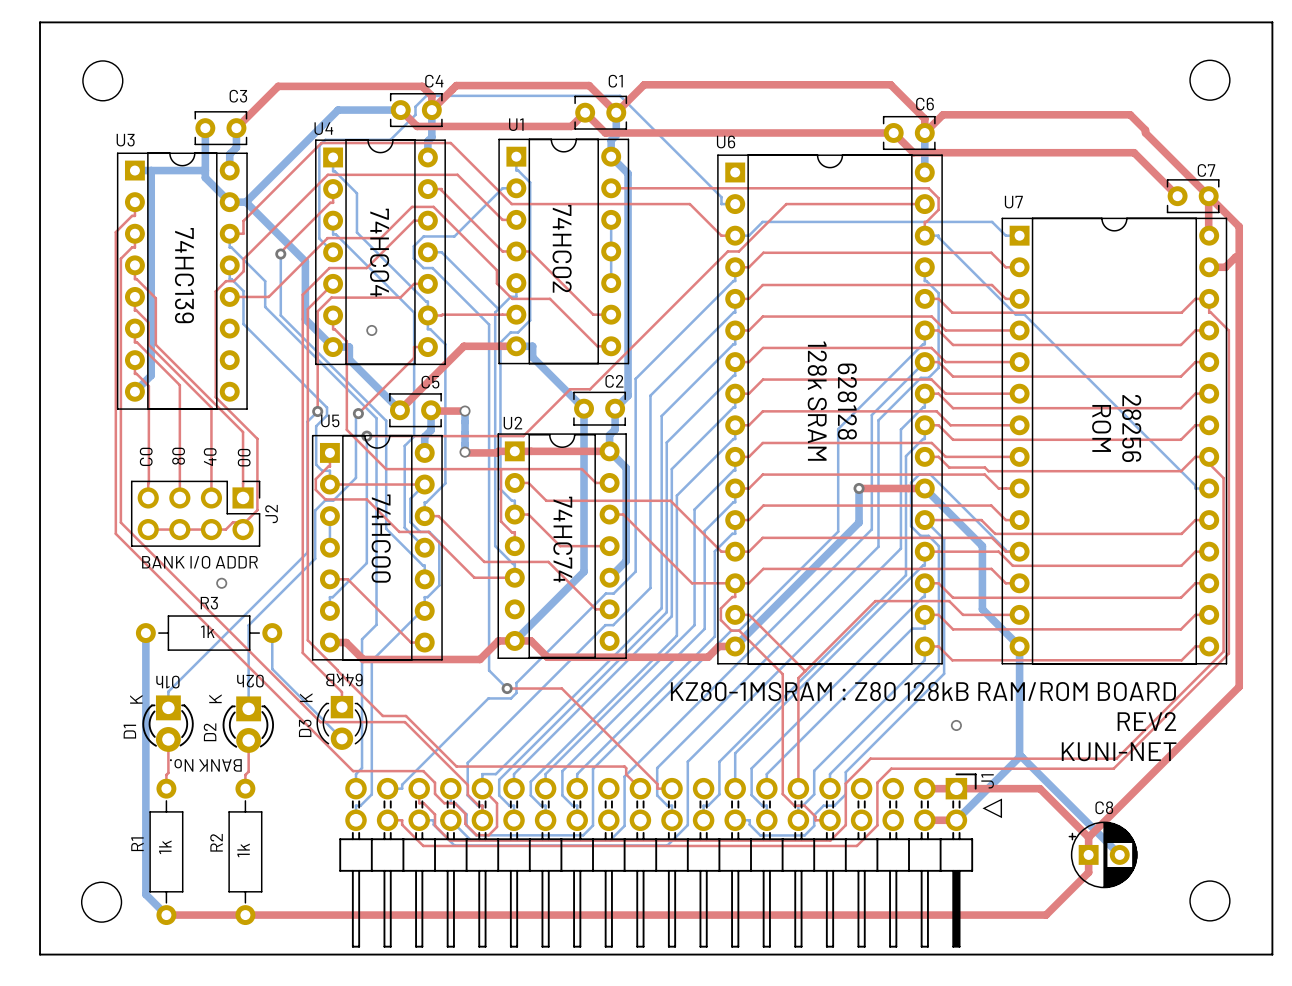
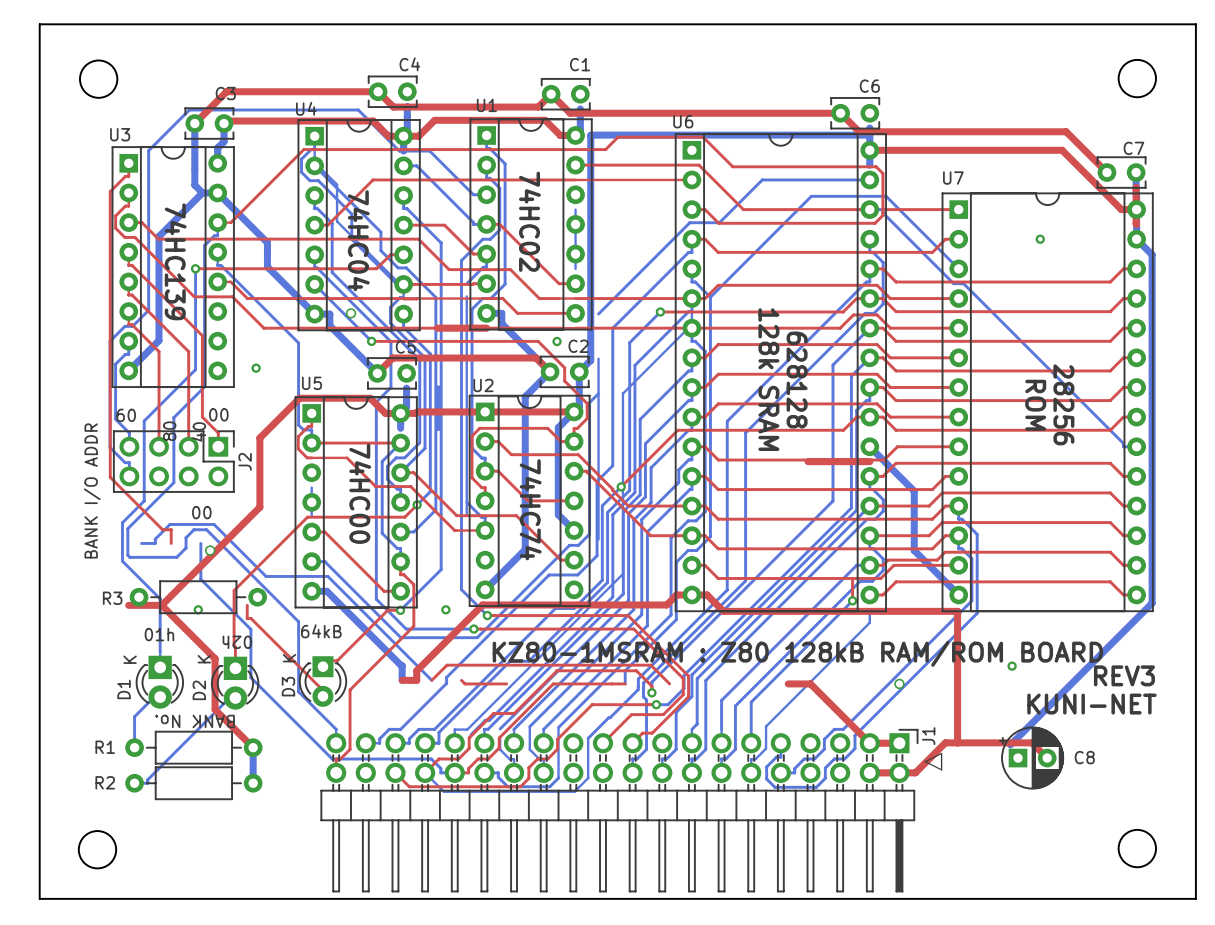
top track: (400, 110) (417, 126) (571, 126) (585, 112) (605, 132) (893, 132) (913, 152) (1134, 152) (1177, 196) -> none
bottom track: (400, 110) (338, 110) (246, 202) -> none
C4 position: (416, 110) -> (392, 91)
C1 position: (600, 112) -> (565, 94)
top track: (239, 125) (278, 86) (422, 86) (431, 95) (431, 110) (456, 85) (589, 85) (616, 112) (644, 84) (890, 84) (924, 118) (924, 132) (942, 114) (1130, 114) (1145, 130) (1145, 132) (1239, 226) (1239, 686) (1088, 837) -> (226, 121) (373, 121) (388, 136) (418, 136) (434, 120) (545, 120) (560, 135) (575, 135)
top track: none -> (194, 123) (226, 91) (378, 91) (393, 107) (538, 107) (551, 94) (570, 113) (840, 113) (859, 131) (1066, 131) (1106, 172)
C6 position: (909, 132) -> (855, 113)
bottom track: none -> (486, 135) (486, 148) (489, 148) (505, 163) (505, 284) (490, 298) (482, 298) (472, 309) (472, 448) (481, 458) (485, 458) (485, 471)
bottom track: (611, 140) (611, 156) (628, 173) (628, 395) (615, 408) -> (869, 135) (591, 135) (590, 360) (579, 371) (579, 386)
bottom track: none -> (314, 136) (314, 149) (311, 149) (301, 159) (301, 172) (309, 180) (318, 180) (351, 214) (351, 239) (403, 291)
bottom track: (516, 156) (516, 170) (530, 182) (530, 320) (518, 332) (510, 332) (500, 342) (500, 489) (511, 500) (514, 500) (514, 514) -> none
top track: none -> (869, 150) (1062, 150) (1121, 209) (1136, 209)
top track: none -> (128, 163) (128, 176) (125, 176) (110, 191) (110, 477) (162, 529) (171, 529) (171, 543)
bottom track: (134, 170) (205, 170) -> none
bottom track: (151, 170) (151, 375) -> (202, 192) (158, 236) (158, 340) (144, 355)
bottom track: none -> (486, 165) (486, 178) (489, 178) (499, 188) (499, 229) (490, 239) (482, 239) (461, 260) (461, 589) (487, 615)
top track: none -> (575, 165) (699, 165) (743, 209) (869, 209)
bottom track: none -> (314, 165) (380, 232) (380, 250) (398, 267) (406, 267) (435, 297) (435, 509) (413, 531) (400, 531)
bottom track: none -> (403, 165) (416, 165) (473, 224) (486, 224)
bottom track: (205, 177) (229, 202) (246, 202) -> (194, 170) (194, 185) (202, 192)
bottom track: none -> (1136, 172) (1136, 239) (1152, 254) (1152, 603) (1010, 744)
bottom track: (516, 188) (502, 188) (454, 236) (423, 236) (413, 246) (413, 258) (423, 268) (432, 268) (489, 324) (489, 670) (507, 688) -> none
top track: none -> (575, 179) (373, 179) (327, 225) (314, 225)
top track: (735, 188) (928, 188) (938, 198) (938, 209) (924, 221) (924, 235) -> none
bottom track: none -> (869, 179) (762, 179) (719, 222) (689, 222) (598, 314)
top track: (333, 189) (333, 202) (330, 202) (280, 254) -> none
top track: (427, 189) (441, 189) (502, 251) (530, 251) (593, 314) -> (128, 222) (141, 222) (158, 239) (418, 239) (449, 269) (510, 269) (539, 298) (558, 298)
C7 position: (1193, 196) -> (1121, 172)
bottom track: none -> (202, 192) (217, 192) (267, 242) (267, 266) (314, 314) (329, 314) (329, 325) (377, 373)
bottom track: (246, 202) (305, 261) (305, 319) (333, 347) (349, 347) (349, 359) (399, 410) -> none
bottom track: none -> (314, 195) (314, 208) (317, 208) (332, 223) (332, 272) (419, 360) (419, 442) (404, 457) (396, 457) (387, 466) (387, 479) (397, 489) (400, 489) (400, 502)
bottom track: none -> (403, 195) (403, 208) (406, 208) (441, 242) (441, 569) (400, 610)
bottom track: none -> (486, 194) (473, 194) (429, 151) (399, 151) (358, 110) (189, 110) (148, 150) (148, 310) (132, 326) (124, 326) (110, 341) (110, 447) (125, 462) (129, 462) (129, 476)
bottom track: (735, 204) (721, 204) (721, 197) (620, 95) (426, 95) (415, 106) (415, 114) (390, 139) (325, 139) (319, 145) (319, 238) (333, 252) -> none
top track: (924, 204) (786, 204) (738, 251) -> (958, 239) (945, 239) (932, 252) (718, 252) (705, 239) (695, 239)
top track: (134, 215) (132, 215) (115, 232) (115, 533) (353, 771) (423, 771) (435, 782) (435, 793) (444, 803) (454, 803) (465, 813) (465, 823) (476, 835) (488, 835) (497, 826) (497, 803) (482, 788) -> none
top track: (516, 219) (502, 219) (457, 174) (327, 174) (243, 259) (243, 271) (233, 281) (226, 281) (215, 291) (215, 397) (257, 438) (257, 510) (245, 522) (233, 522) (225, 529) (148, 529) -> none
bottom track: none -> (869, 209) (882, 209) (882, 212) (953, 283) (963, 283) (1123, 443) (1123, 446) (1136, 446)
top track: none -> (882, 209) (958, 209)
bottom track: (333, 220) (333, 234) (335, 234) (414, 312) (414, 436) (404, 445) (404, 527) (424, 547) -> none
top track: (427, 220) (414, 220) (366, 268) (329, 268) (302, 294) (302, 652) (341, 692) (341, 707) -> none
top track: (134, 233) (134, 247) (132, 247) (120, 258) (120, 522) (320, 722) (404, 722) (467, 785) (467, 794) (478, 805) (482, 805) (482, 820) -> (625, 683) (553, 683) (499, 738) (499, 748) (488, 758) (478, 758) (468, 768) (468, 772) (454, 772)
top track: (243, 233) (243, 221) (321, 143) (450, 143) (511, 204) (689, 204) (721, 235) (735, 235) -> (230, 222) (303, 149) (605, 149) (618, 137) (703, 137) (732, 166) (876, 166) (882, 173) (882, 215) (875, 223) (718, 223) (705, 209) (691, 209)
top track: none -> (486, 224) (499, 224) (559, 283) (575, 283)
bottom track: (735, 235) (748, 235) (762, 221) (992, 221) (1005, 235) (1019, 235) -> none
bottom track: (924, 235) (938, 235) (1015, 314) (1024, 314) (1195, 485) (1195, 488) (1209, 488) -> none
top track: none -> (403, 225) (444, 225) (473, 254) (486, 254)
bottom track: (229, 247) (265, 281) (265, 306) (376, 418) (376, 624) (362, 639) (362, 768) (356, 774) -> (217, 235) (214, 235) (204, 245) (204, 386) (173, 417) (173, 482) (127, 528) (127, 555) (130, 557) (176, 557) (186, 548) (186, 537) (194, 529) (206, 529) (298, 621) (298, 691) (336, 729)
text position: 74HC02 (562, 248) -> 74HC02 (529, 221)
U1 position: (563, 251) -> (531, 224)
top track: (735, 251) (727, 251) (590, 389) (570, 389) (523, 436) (366, 436) -> none
bottom track: none -> (869, 239) (869, 252) (873, 252) (883, 262) (883, 304) (873, 313) (865, 313) (745, 432) (745, 580) (643, 682) (643, 688)
via: none -> (1040, 239)
U4 position: (380, 252) -> (359, 225)
bottom track: (427, 252) (441, 252) (498, 309) -> none
bottom track: (280, 254) (280, 315) (386, 420) (386, 528) (424, 565) (424, 579) -> none
via: (280, 254) -> none
top track: (1239, 257) (1235, 257) (1225, 267) (1209, 267) -> none
bottom track: none -> (486, 254) (486, 267) (483, 267) (466, 283)
top track: (735, 267) (748, 267) (763, 252) (991, 252) (1005, 267) (1019, 267) -> none
bottom track: (735, 267) (735, 281) (635, 378) -> none
bottom track: (924, 267) (924, 281) (938, 293) (938, 367) (928, 377) (920, 377) (878, 420) (878, 546) (657, 768) (657, 795) (667, 805) (672, 805) -> (643, 688) (643, 696) (646, 699) (646, 749) (636, 758) (632, 759)
bottom track: none -> (314, 254) (314, 267) (317, 267) (390, 341) (390, 387) (376, 402) (376, 599) (406, 629) (473, 629)
top track: none -> (403, 254) (390, 254) (376, 268) (195, 268)
top track: (134, 279) (155, 298) (155, 344) (243, 432) (243, 497) -> (128, 265) (132, 265) (202, 335) (202, 417) (218, 433) (218, 446)
bottom track: (229, 279) (243, 291) (243, 324) (327, 407) (327, 415) (316, 426) (316, 464) (322, 470) (329, 470) (329, 484) -> (217, 265) (220, 265) (298, 342) (298, 425) (303, 429) (311, 429) (311, 443)
via: none -> (195, 268)
top track: (333, 283) (307, 309) (307, 640) (382, 715) (406, 715) (456, 766) (624, 766) (626, 774) (640, 788) -> (473, 629) (633, 629) (683, 678) (683, 694) (663, 714) (631, 714) (602, 743)
top track: (427, 283) (414, 283) (400, 297) (331, 297) (317, 311) (317, 411) -> none
bottom track: (516, 283) (516, 296) (510, 296) (495, 312) -> none
bottom track: none -> (691, 268) (691, 282) (695, 282) (710, 297)
top track: none -> (869, 268) (882, 268) (896, 282) (1110, 282) (1123, 268) (1136, 268)
bottom track: none -> (869, 268) (869, 282) (866, 282) (727, 421) (727, 590) (638, 678) (638, 686)
bottom track: none -> (958, 268) (886, 196) (811, 196) (710, 297)
top track: (243, 296) (268, 296) (327, 238) (380, 238) (412, 206) (433, 206) (496, 270) (496, 283) (512, 298) -> (230, 281) (247, 298) (417, 298)
top track: none -> (482, 283) (403, 284)
top track: (516, 298) (550, 298) (597, 346) -> (486, 328) (562, 328)
top track: (735, 298) (748, 298) (762, 285) (991, 285) (1005, 298) (1019, 298) -> none
bottom track: (735, 298) (735, 312) (650, 395) (650, 587) (613, 625) (605, 625) (467, 762) (467, 795) (477, 805) (482, 805) (482, 820) -> (200, 543) (200, 579) (250, 629) (250, 677) (332, 758) (431, 758) (440, 768) (440, 772) (454, 772)
top track: (924, 298) (938, 298) (952, 312) (1181, 312) (1195, 298) (1209, 298) (1209, 312) (1228, 330) (1228, 653) (1113, 768) (891, 768) (877, 782) (877, 825) (856, 845) (423, 845) (402, 824) (402, 820) (387, 820) -> none
bottom track: none -> (314, 284) (371, 341)
top track: (134, 310) (148, 322) (148, 344) (211, 407) (211, 497) -> (128, 294) (132, 295) (188, 351) (188, 446)
bottom track: (427, 313) (427, 329) (430, 329) (445, 344) (445, 483) (424, 502) (424, 516) -> (403, 297) (400, 297) (390, 307) (390, 323) (425, 357) (425, 448) (400, 472)
bottom track: none -> (710, 297) (710, 536) (696, 550) (688, 550) (676, 562) (676, 619) (625, 670) (625, 683)
top track: none -> (486, 298) (502, 298) (517, 313) (575, 313)
top track: none -> (575, 298) (705, 298) (718, 285) (877, 285) (890, 298) (958, 298)
bottom track: none -> (691, 298) (691, 311) (688, 311) (634, 365) (634, 492) (612, 514) (612, 596) (489, 720) (485, 720) (470, 734)
top track: none -> (1136, 298) (1123, 298) (1110, 311) (896, 311) (882, 298) (856, 298) (843, 312) (660, 312)
top track: (333, 315) (333, 329) (346, 341) (346, 429) (386, 469) (582, 469) (595, 482) (609, 482) -> none
bottom track: none -> (660, 312) (629, 342) (629, 490) (607, 512) (607, 582) (528, 661) (510, 661) (438, 732) (438, 743) (425, 743)
via: none -> (660, 312)
bottom track: none -> (486, 313) (501, 313) (501, 323) (550, 371) (525, 396) (525, 549) (485, 589)
top track: (735, 330) (748, 330) (762, 316) (931, 316) (945, 330) (1019, 330) -> none
top track: (924, 330) (938, 330) (953, 344) (1180, 344) (1195, 330) (1209, 330) -> none
bottom track: (924, 330) (924, 344) (838, 429) (838, 531) (739, 630) (731, 630) (593, 768) (593, 771) -> (691, 328) (691, 341) (695, 341) (705, 351) (705, 511) (696, 520) (688, 520) (671, 537) (671, 615) (558, 727)
bottom track: none -> (403, 314) (403, 327) (430, 353) (430, 491) (417, 504)
top track: (134, 342) (179, 385) (179, 497) -> (128, 324) (132, 324) (159, 351) (159, 446)
top track: (463, 346) (399, 410) -> (437, 328) (263, 328) (232, 296) (194, 296) (134, 237) (124, 237) (115, 228) (115, 215) (125, 206) (128, 205)
bottom track: (516, 346) (532, 346) (532, 357) (584, 408) (584, 571) (514, 640) -> none
top track: none -> (575, 328) (840, 328) (853, 314) (877, 314) (890, 328) (958, 328)
top track: none -> (869, 328) (882, 328) (896, 341) (1110, 341) (1123, 328) (1136, 328)
bottom track: none -> (869, 328) (832, 364) (832, 501) (651, 682) (651, 692)
top track: (427, 347) (414, 347) (414, 357) (358, 413) -> none
top track: (134, 360) (134, 373) (148, 386) (148, 497) -> none
bottom track: none -> (128, 341) (128, 354) (125, 354) (115, 364) (115, 419) (129, 433) (129, 446)
top track: none -> (371, 341) (538, 341) (564, 367) (564, 381) (587, 403) (587, 418) (577, 428) (574, 428) (574, 441) (560, 441) (547, 428) (479, 428) (472, 436) (472, 477) (481, 487) (485, 487) (485, 500)
via: none -> (371, 341)
via: none -> (557, 341)
top track: (735, 362) (748, 362) (763, 347) (931, 347) (945, 362) (1019, 362) -> none
bottom track: (735, 362) (735, 375) (666, 442) (666, 612) (499, 779) (499, 795) (509, 805) (514, 805) (514, 820) -> none
top track: (924, 362) (938, 362) (953, 376) (1180, 376) (1195, 362) (1209, 362) -> none
bottom track: (924, 362) (871, 415) (871, 529) (624, 776) (624, 783) -> (638, 686) (638, 689) (588, 738)
top track: none -> (691, 357) (705, 357) (718, 344) (877, 344) (890, 357) (958, 357)
top track: none -> (869, 357) (882, 357) (896, 370) (1110, 370) (1123, 357) (1136, 357)
bottom track: none -> (869, 357) (851, 376) (851, 508) (684, 675) (684, 688) (667, 704) (656, 704)
via: none -> (256, 368)
top track: none -> (550, 371) (536, 358) (392, 358) (377, 373)
top track: (735, 393) (748, 393) (763, 379) (931, 379) (945, 393) (1019, 393) -> none
bottom track: (735, 393) (735, 407) (671, 469) (671, 616) (514, 774) -> (691, 357) (691, 370) (688, 370) (640, 419) (640, 494) (623, 511) (623, 593) (487, 729) (484, 729)
top track: (924, 393) (938, 393) (953, 408) (1180, 408) (1195, 393) (1209, 393) -> none
bottom track: (924, 393) (924, 407) (900, 429) (900, 548) (687, 761) (687, 825) (667, 845) (454, 845) (433, 824) (433, 820) (419, 820) -> none
C2 position: (599, 408) -> (564, 371)
top track: none -> (691, 387) (705, 387) (718, 374) (877, 374) (890, 387) (958, 387)
bottom track: none -> (691, 387) (691, 400) (688, 400) (645, 443) (645, 496) (628, 513) (628, 600) (500, 728)
U6 position: (830, 409) -> (780, 372)
top track: none -> (869, 387) (882, 387) (896, 400) (1110, 400) (1123, 387) (1136, 387)
C5 position: (415, 410) -> (391, 373)
top track: (431, 410) (465, 411) -> none
bottom track: (317, 411) (307, 421) (307, 552) (168, 691) -> (195, 268) (195, 369) (144, 420) (144, 501) (122, 522) (122, 561) (160, 598) (160, 652)
via: (317, 411) -> none
via: (465, 411) -> none
bottom track: (358, 413) (355, 416) (355, 477) (333, 500) (325, 500) (315, 510) (315, 558) (248, 625) (248, 708) -> none
via: (358, 413) -> none
bottom track: none -> (598, 393) (589, 402) (589, 534) (578, 545) (569, 545) (477, 637) (400, 637) (324, 561) (311, 561)
top track: (735, 425) (748, 425) (762, 411) (936, 411) (950, 425) (1019, 425) -> none
bottom track: (735, 425) (735, 439) (676, 495) (676, 635) (530, 781) -> none
top track: (924, 425) (938, 425) (953, 439) (1180, 439) (1195, 425) (1209, 425) -> none
bottom track: (924, 425) (924, 439) (905, 456) (905, 575) (719, 761) (719, 794) (708, 805) (703, 805) -> (869, 387) (869, 400) (866, 400) (856, 410) (856, 510) (691, 674) (691, 696) (676, 712) (676, 749) (666, 758) (662, 759)
top track: none -> (574, 411) (385, 413) (370, 398) (299, 398) (259, 438) (259, 507) (161, 605)
bottom track: (609, 435) (609, 451) (626, 467) (626, 561) (609, 577) -> (574, 411) (558, 427) (558, 514) (574, 530)
bottom track: (366, 436) (366, 563) (332, 597) (329, 597) (329, 610) -> none
via: (366, 436) -> none
top track: none -> (311, 413) (311, 426) (308, 426) (298, 436) (298, 448) (307, 457) (311, 457)
text: none -> 60 (126, 415)
top track: none -> (691, 417) (705, 417) (718, 403) (877, 403) (890, 417) (958, 417)
U7 position: (1114, 441) -> (1047, 402)
top track: none -> (1136, 417) (1123, 417) (1110, 430) (896, 430) (882, 417) (856, 417) (843, 430) (677, 430) (621, 486)
top track: (609, 451) (465, 452) -> none
top track: (329, 452) (329, 466) (315, 479) (315, 489) (325, 499) (366, 499) (399, 531) (428, 531) (474, 577) (514, 577) -> none
via: (465, 452) -> none
text: C0 (146, 456) -> none
top track: (735, 456) (748, 456) (762, 442) (931, 442) (945, 456) (1019, 456) -> none
bottom track: (735, 456) (735, 470) (694, 509) (694, 625) (545, 774) -> (691, 417) (691, 430) (688, 430) (651, 467) (651, 502) (633, 520) (633, 609) (514, 729)
top track: (924, 456) (938, 456) (949, 467) (984, 467) (988, 471) (1181, 471) (1195, 456) (1209, 456) -> none
top track: (1202, 456) (1223, 478) (1223, 651) (1116, 758) (870, 758) (845, 783) (845, 825) (830, 840) (449, 840) (435, 825) (435, 814) (423, 803) (419, 803) (419, 788) -> none
text rotation: 0° (244, 457) -> 90° clockwise (218, 414)
top track: none -> (485, 441) (498, 441) (511, 454) (578, 454) (628, 506) (705, 506) (718, 519) (932, 519) (945, 506) (958, 506)
top track: none -> (311, 443) (400, 443)
bottom track: none -> (400, 443) (382, 461) (382, 533) (397, 548) (400, 548) (400, 561)
top track: (500, 469) (500, 521) (511, 532) (514, 532) (514, 546) -> none
top track: none -> (691, 446) (705, 446) (718, 460) (884, 460) (897, 446) (958, 446)
bottom track: none -> (869, 446) (914, 491) (914, 550) (958, 594)
top track: (514, 482) (528, 482) (546, 500) (670, 500) (721, 551) (748, 551) (762, 537) (992, 537) (1005, 551) (1019, 551) -> none
top track: (367, 484) (424, 484) -> none
bottom track: (424, 484) (410, 498) (410, 522) (420, 531) (429, 531) (439, 541) (439, 585) (427, 597) (424, 597) (424, 610) -> none
top track: (735, 488) (748, 488) (762, 474) (984, 474) (998, 488) (1019, 488) -> none
bottom track: (735, 488) (735, 502) (704, 531) (704, 628) (562, 771) -> (691, 446) (691, 459) (688, 459) (678, 469) (678, 482) (641, 519) (641, 614) (529, 726)
bottom track: (859, 488) (859, 522) (735, 646) -> none
via: (859, 488) -> none
bottom track: (924, 488) (982, 546) (982, 609) (1019, 646) (1019, 757) -> none
top track: none -> (485, 471) (498, 471) (527, 500) (574, 500)
top track: none -> (574, 471) (587, 471) (650, 535) (705, 535) (718, 548) (932, 548) (945, 535) (958, 535)
top track: none -> (400, 472) (413, 472) (456, 515) (516, 515) (560, 560) (574, 560)
top track: none -> (691, 476) (705, 476) (718, 489) (932, 489) (945, 476) (958, 476)
top track: none -> (869, 476) (882, 476) (896, 463) (1110, 463) (1123, 476) (1136, 476)
J2 position: (195, 513) -> (173, 461)
top track: (514, 514) (528, 514) (560, 546) (609, 546) -> none
top track: (609, 514) (623, 514) (692, 583) (748, 583) (763, 568) (991, 568) (1005, 583) (1019, 583) -> none
bottom track: none -> (621, 486) (602, 505) (602, 580) (574, 608) (555, 608) (434, 729) (418, 729) (409, 738) (409, 743) (395, 743)
via: none -> (621, 486)
top track: (424, 516) (438, 516) (484, 561) -> (346, 457) (375, 486) (410, 486) (456, 530)
top track: (735, 520) (748, 520) (763, 505) (991, 505) (1005, 520) (1019, 520) -> none
bottom track: (735, 520) (735, 533) (732, 533) (714, 551) (714, 636) (577, 774) -> (691, 476) (691, 489) (647, 531) (647, 625) (543, 729)
top track: (924, 520) (981, 520) (995, 533) (1181, 533) (1195, 520) (1209, 520) -> none
bottom track: (924, 520) (944, 539) (944, 673) (845, 772) (845, 794) (834, 805) (823, 805) (814, 815) (814, 825) (804, 835) (760, 835) (749, 824) (749, 820) (735, 820) -> (869, 476) (869, 489) (873, 489) (883, 499) (883, 511) (875, 519) (867, 519) (705, 680) (705, 749) (696, 758) (691, 758) (691, 772)
bottom track: none -> (466, 502) (481, 517) (485, 517) (485, 530)
top track: none -> (417, 504) (404, 517) (307, 517) (234, 590) (235, 662)
via: none -> (417, 504)
top track: none -> (869, 506) (929, 506) (942, 492) (1110, 492) (1123, 506) (1136, 506)
text position: 74HC00 (381, 538) -> 74HC00 (360, 493)
text: none -> 00 (201, 512)
bottom track: (495, 546) (514, 563) (514, 577) -> none
U2 position: (562, 546) -> (529, 500)
U5 position: (377, 547) -> (356, 502)
top track: (924, 551) (998, 551) (1012, 565) (1181, 565) (1195, 551) (1209, 551) -> none
bottom track: (924, 551) (924, 565) (735, 753) (735, 773) -> (869, 506) (697, 678) (697, 724) (691, 729)
bottom track: (1019, 551) (1005, 551) (930, 474) (919, 474) (911, 482) (911, 526) (920, 535) (928, 535) (938, 546) (938, 665) (830, 774) (830, 788) -> (958, 506) (958, 519) (962, 519) (977, 534) (977, 613) (854, 735) (854, 748) (844, 758) (834, 758) (825, 768) (825, 778) (816, 787) (774, 787) (766, 779) (766, 766) (776, 757) (780, 757) (780, 743)
top track: (514, 561) (548, 561) (595, 609) (609, 609) -> none
text rotation: 0° (199, 562) -> 90° counterclockwise (92, 490)
top track: none -> (311, 531) (324, 531) (384, 591) (400, 591)
top track: none -> (869, 535) (929, 535) (942, 522) (1110, 522) (1123, 535) (1136, 535)
bottom track: none -> (958, 535) (958, 548) (962, 548) (971, 558) (971, 600) (843, 729) (834, 729) (824, 739) (824, 749) (814, 758) (804, 758) (794, 768) (794, 772) (780, 772)
bottom track: (635, 571) (613, 593) (605, 593) (516, 683) (516, 692) (511, 698) (488, 698) (402, 784) (402, 788) -> (691, 239) (691, 252) (688, 252) (612, 328) (612, 465) (597, 481) (597, 555) (577, 574) (549, 574) (446, 677) (446, 683) (400, 729) (389, 729) (379, 738) (379, 743)
bottom track: none -> (141, 543) (155, 543) (155, 539) (169, 524) (214, 524) (266, 576) (327, 576) (431, 680)
top track: (329, 579) (347, 579) (410, 642) (424, 642) -> none
top track: (735, 583) (735, 597) (732, 597) (720, 608) (720, 620) (731, 630) -> (402, 680) (416, 680) (416, 670) (482, 604) (666, 604) (676, 594) (688, 594)
top track: (924, 583) (938, 583) (953, 597) (1180, 597) (1195, 583) (1209, 583) -> none
bottom track: (924, 583) (924, 597) (751, 768) (751, 795) (762, 805) (766, 805) -> (869, 535) (869, 548) (873, 548) (883, 559) (883, 570) (872, 581) (860, 581) (735, 705) (735, 749) (725, 758) (721, 759)
top track: none -> (400, 561) (400, 574) (403, 574) (413, 584) (413, 626) (350, 689) (350, 749) (340, 758) (336, 758) (336, 772)
top track: none -> (691, 565) (705, 565) (718, 578) (880, 578) (893, 565) (958, 565)
top track: none -> (869, 565) (882, 565) (888, 560) (937, 560) (945, 552) (1110, 552) (1123, 565) (1136, 565)
R3 name position: R3 (209, 603) -> R3 (112, 598)
bottom track: (424, 607) (371, 660) (371, 794) (360, 805) (356, 805) (356, 820) -> none
top track: none -> (852, 578) (852, 600)
top track: (735, 614) (748, 614) (805, 671) -> none
top track: (924, 614) (938, 614) (953, 629) (1180, 629) (1195, 614) (1209, 614) -> none
bottom track: (924, 614) (924, 628) (912, 628) (766, 774) -> (869, 565) (856, 565) (721, 700) (721, 729)
top track: (1019, 614) (962, 614) (949, 601) (875, 601) (798, 678) (798, 788) -> none
bottom track: none -> (311, 591) (326, 591) (402, 665) (402, 680)
top track: (739, 630) (782, 674) (782, 794) (794, 805) (804, 805) (815, 816) (815, 820) (830, 820) -> (695, 594) (707, 594) (723, 611) (957, 611) (957, 742)
top track: none -> (869, 594) (882, 594) (896, 581) (1110, 581) (1123, 594) (1136, 594)
text: 1k (207, 631) -> none
bottom track: (145, 633) (145, 894) (166, 915) -> none
bottom track: (272, 633) (272, 669) (341, 738) -> none
bottom track: none -> (852, 600) (751, 702) (751, 743)
via: none -> (852, 600)
top track: none -> (128, 605) (161, 605)
top track: none -> (161, 605) (215, 658) (215, 709) (253, 747)
top track: none -> (247, 605) (247, 618) (251, 618) (322, 690)
top track: (329, 642) (346, 642) (363, 659) (479, 659) (498, 640) (531, 640) (547, 657) (708, 657) (718, 646) (735, 646) -> none
via: none -> (198, 609)
via: none -> (445, 609)
top track: (924, 646) (938, 646) (952, 660) (1181, 660) (1195, 646) (1209, 646) -> none
top track: none -> (400, 610) (387, 610) (337, 660) (322, 660)
via: none -> (400, 610)
via: none -> (487, 615)
via: none -> (473, 629)
text rotation: 0° (344, 679) -> 180° (321, 631)
text rotation: 0° (167, 682) -> 180° (159, 634)
top track: (507, 688) (561, 688) (657, 784) (657, 788) (672, 788) -> (487, 615) (628, 615) (688, 676) (688, 696) (652, 733) (642, 733) (632, 743)
via: (507, 688) -> none
via: none -> (1012, 666)
top track: none -> (431, 680) (447, 665) (650, 665) (669, 683)
top track: none -> (461, 680) (465, 683) (506, 683)
text: REV2 (1146, 721) -> REV3 (1124, 675)
top track: none -> (788, 683) (810, 683) (869, 743)
bottom track: none -> (160, 691) (134, 716) (134, 747)
bottom track: none -> (235, 692) (147, 779) (147, 783) (134, 783)
top track: none -> (651, 692) (651, 686) (636, 670) (557, 670) (514, 713) (493, 713) (469, 737) (469, 748) (458, 758) (438, 758) (425, 772)
via: none -> (651, 692)
top track: (168, 739) (166, 788) -> none
top track: (248, 740) (248, 771) (245, 774) (245, 788) -> none
top track: none -> (656, 704) (592, 704) (557, 739) (557, 749) (547, 758) (537, 758) (528, 767) (528, 778) (520, 786) (409, 786) (395, 772)
via: none -> (656, 704)
text position: KUNI-NET (1119, 751) -> KUNI-NET (1091, 704)
bottom track: (1019, 757) (956, 820) -> none
bottom track: (1019, 757) (1021, 757) (1119, 854) -> none
R1 footprint: [149, 778, 184, 926] -> [125, 730, 263, 765]
R2 footprint: [228, 778, 263, 926] -> [125, 766, 263, 800]
bottom track: (450, 788) (450, 803) (455, 803) (466, 814) (466, 825) (476, 835) (583, 835) (593, 825) -> (484, 772) (498, 772) (498, 777) (507, 786) (549, 786) (558, 777)
top track: (956, 788) (1039, 788) (1088, 837) -> none
bottom track: none -> (253, 747) (253, 783)
top track: none -> (1047, 758) (1032, 742) (945, 742) (915, 772) (899, 772)
C8 name position: C8 (1104, 807) -> C8 (1084, 757)
top track: (1088, 837) (1088, 872) (1046, 915) (166, 915) -> none
R2 name position: R2 (216, 842) -> R2 (105, 782)
R1 name position: R1 (137, 844) -> R1 (105, 747)
text: 1k (165, 847) -> none
text: 1k (243, 850) -> none
C8 position: (1103, 854) -> (1031, 758)

